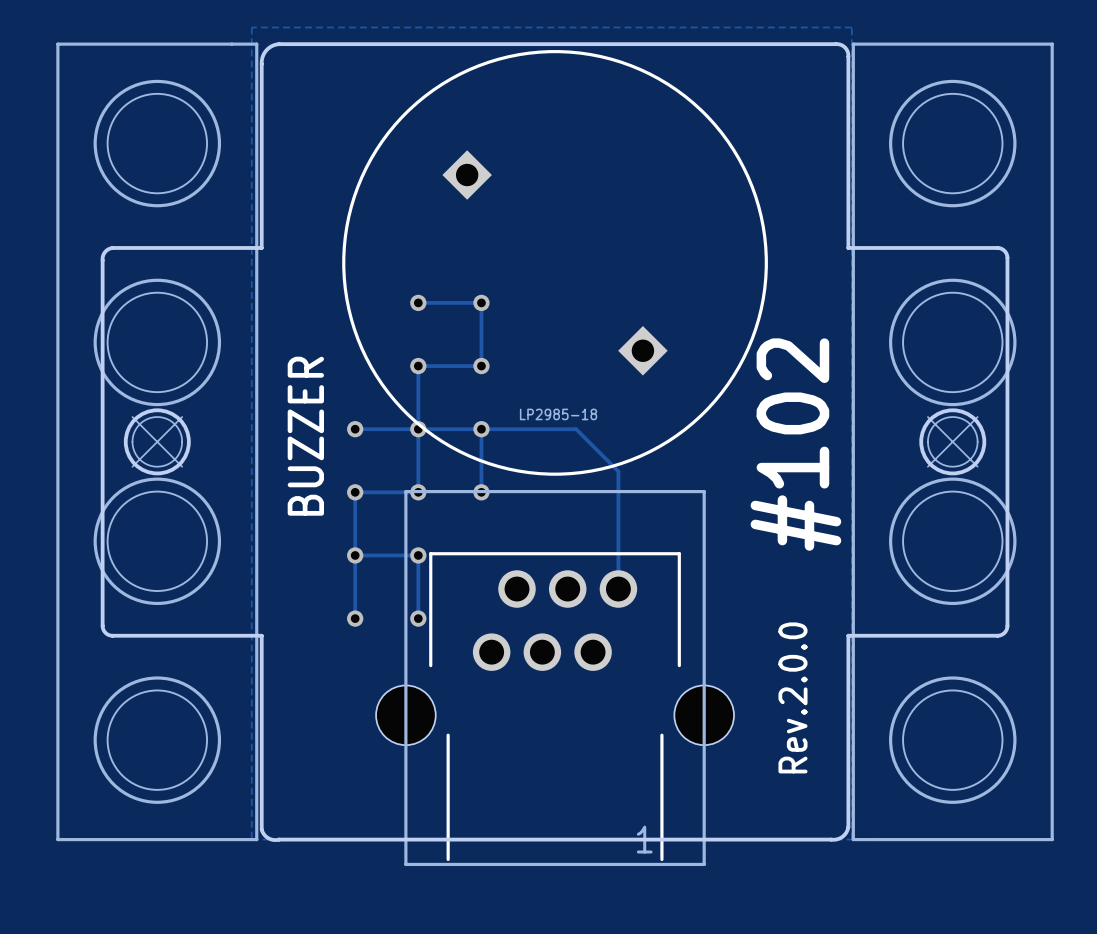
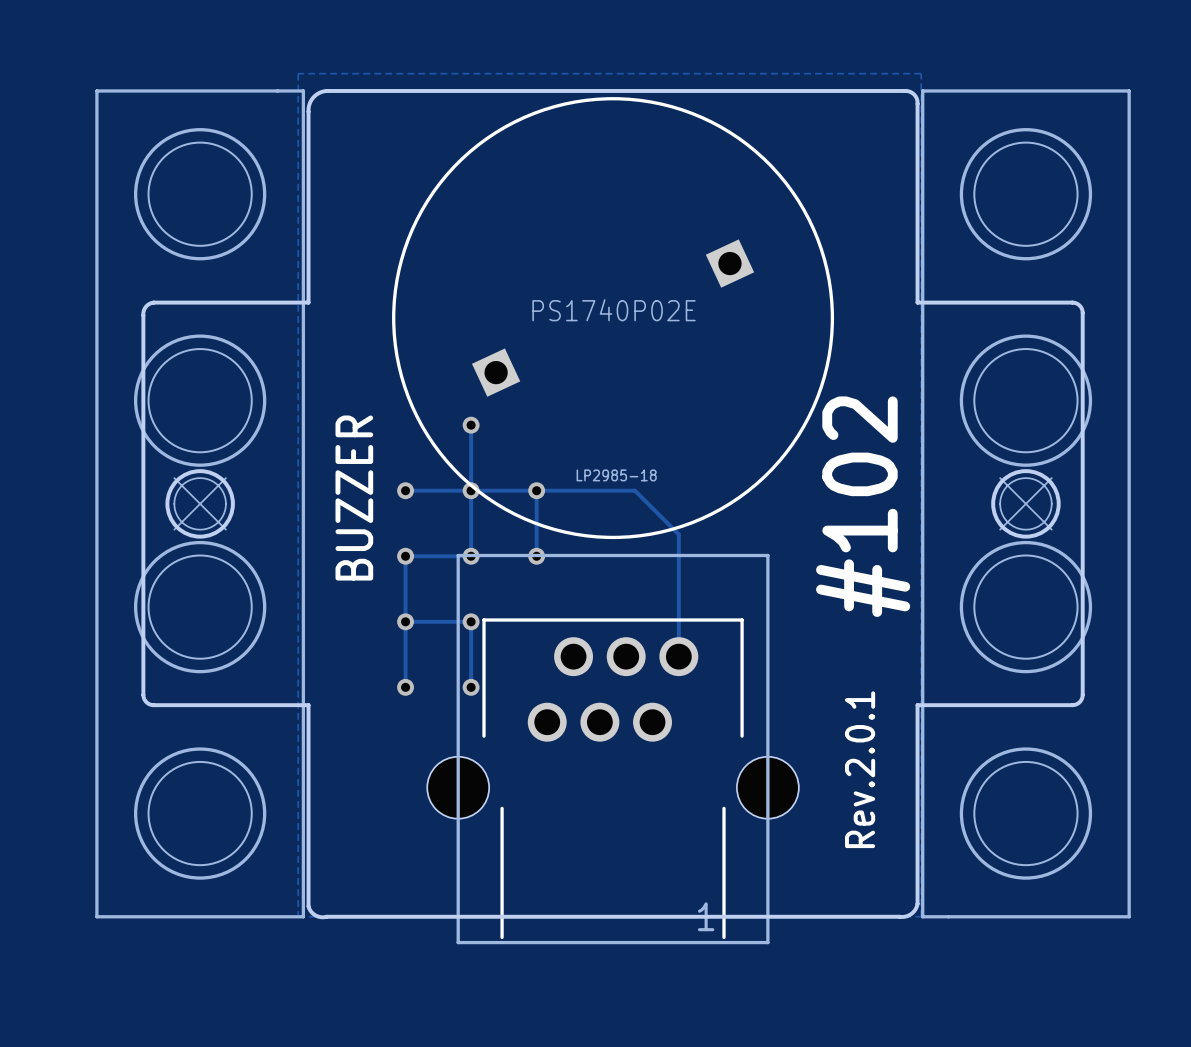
text: none -> PS1740P02E (614, 310)
part rotation: 0° (555, 262) -> 70° counterclockwise (613, 318)
track: (418, 302) (481, 302) (481, 366) (418, 366) -> none
via: (418, 302) -> none
via: (481, 302) -> none
via: (481, 366) -> none
text: Rev.2.0.0 (792, 697) -> Rev.2.0.1 (860, 769)

